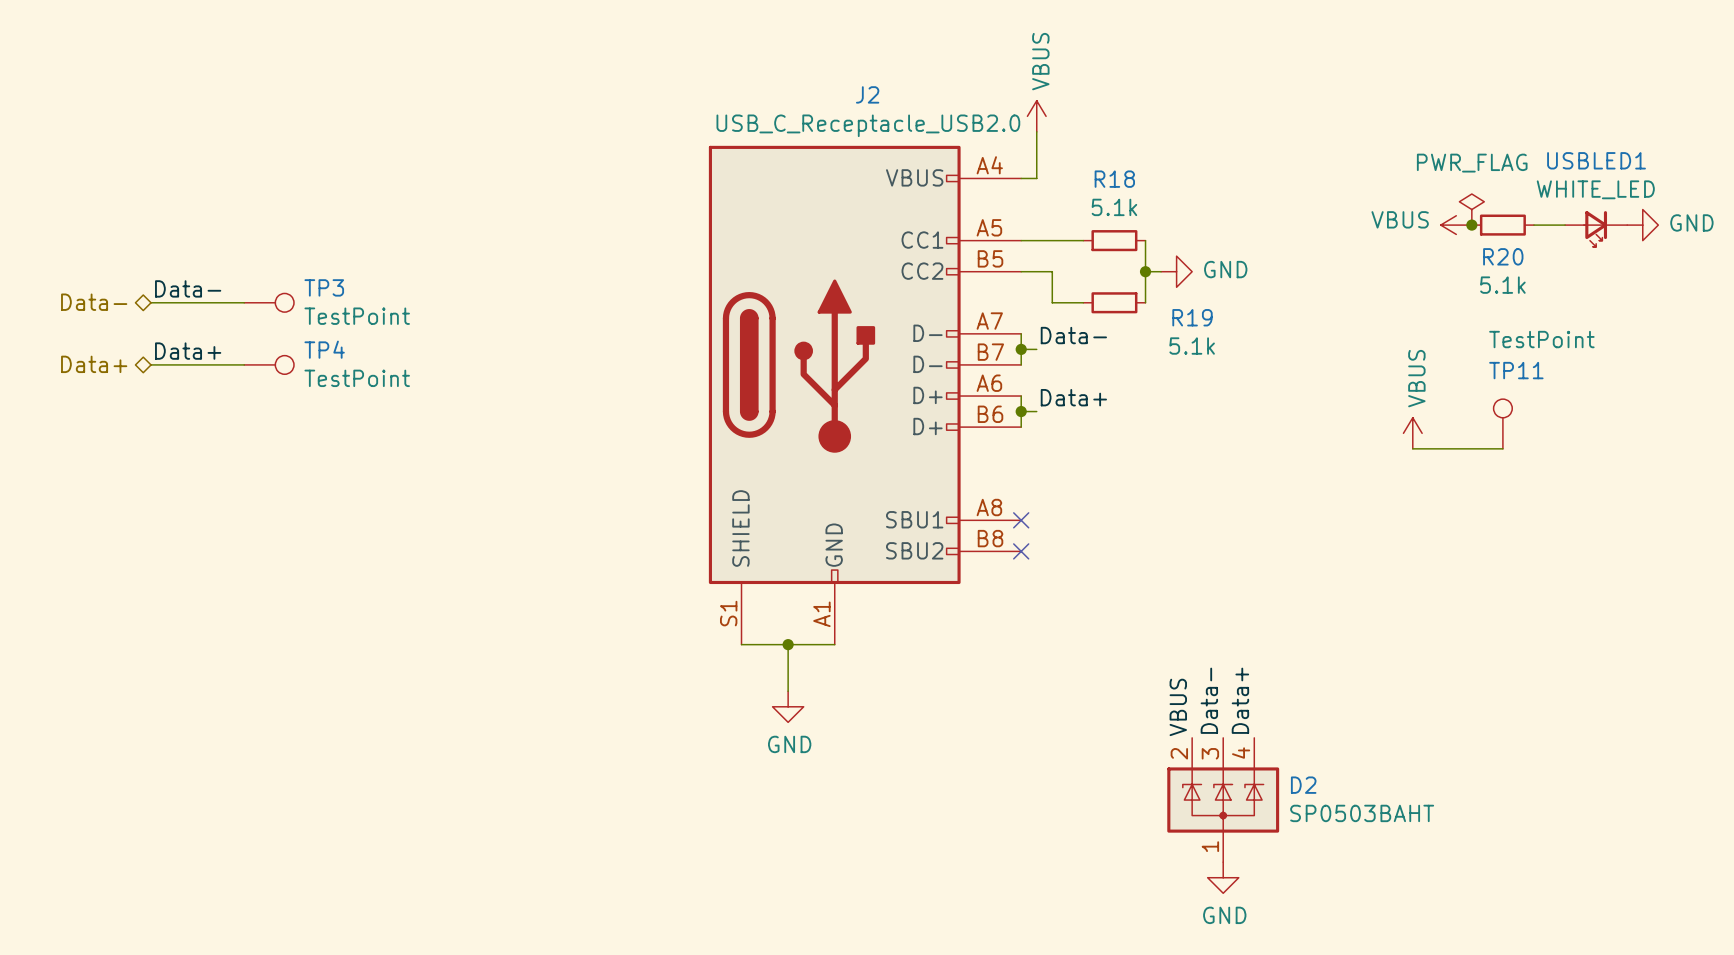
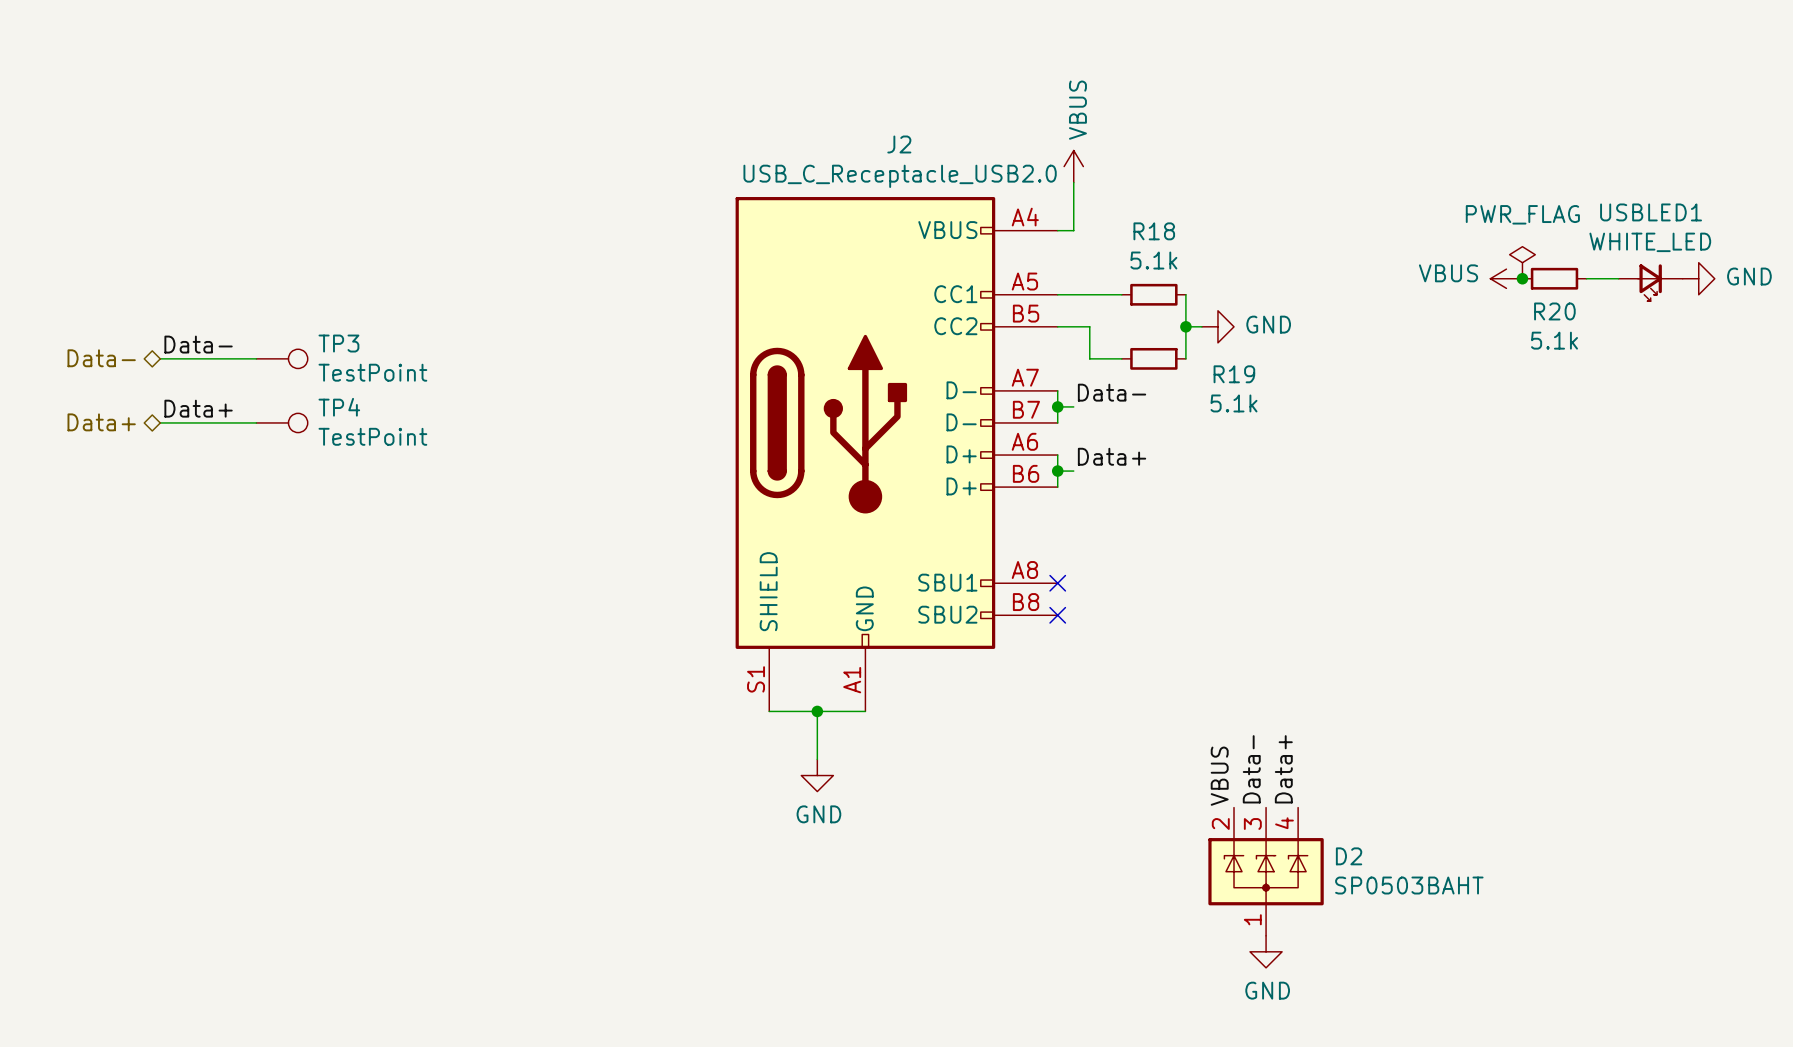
TP11: TestPoint (1502, 423) -> none
power symbol: VBUS (1412, 433) -> none
wire: (1412, 448) (1502, 448) -> none

